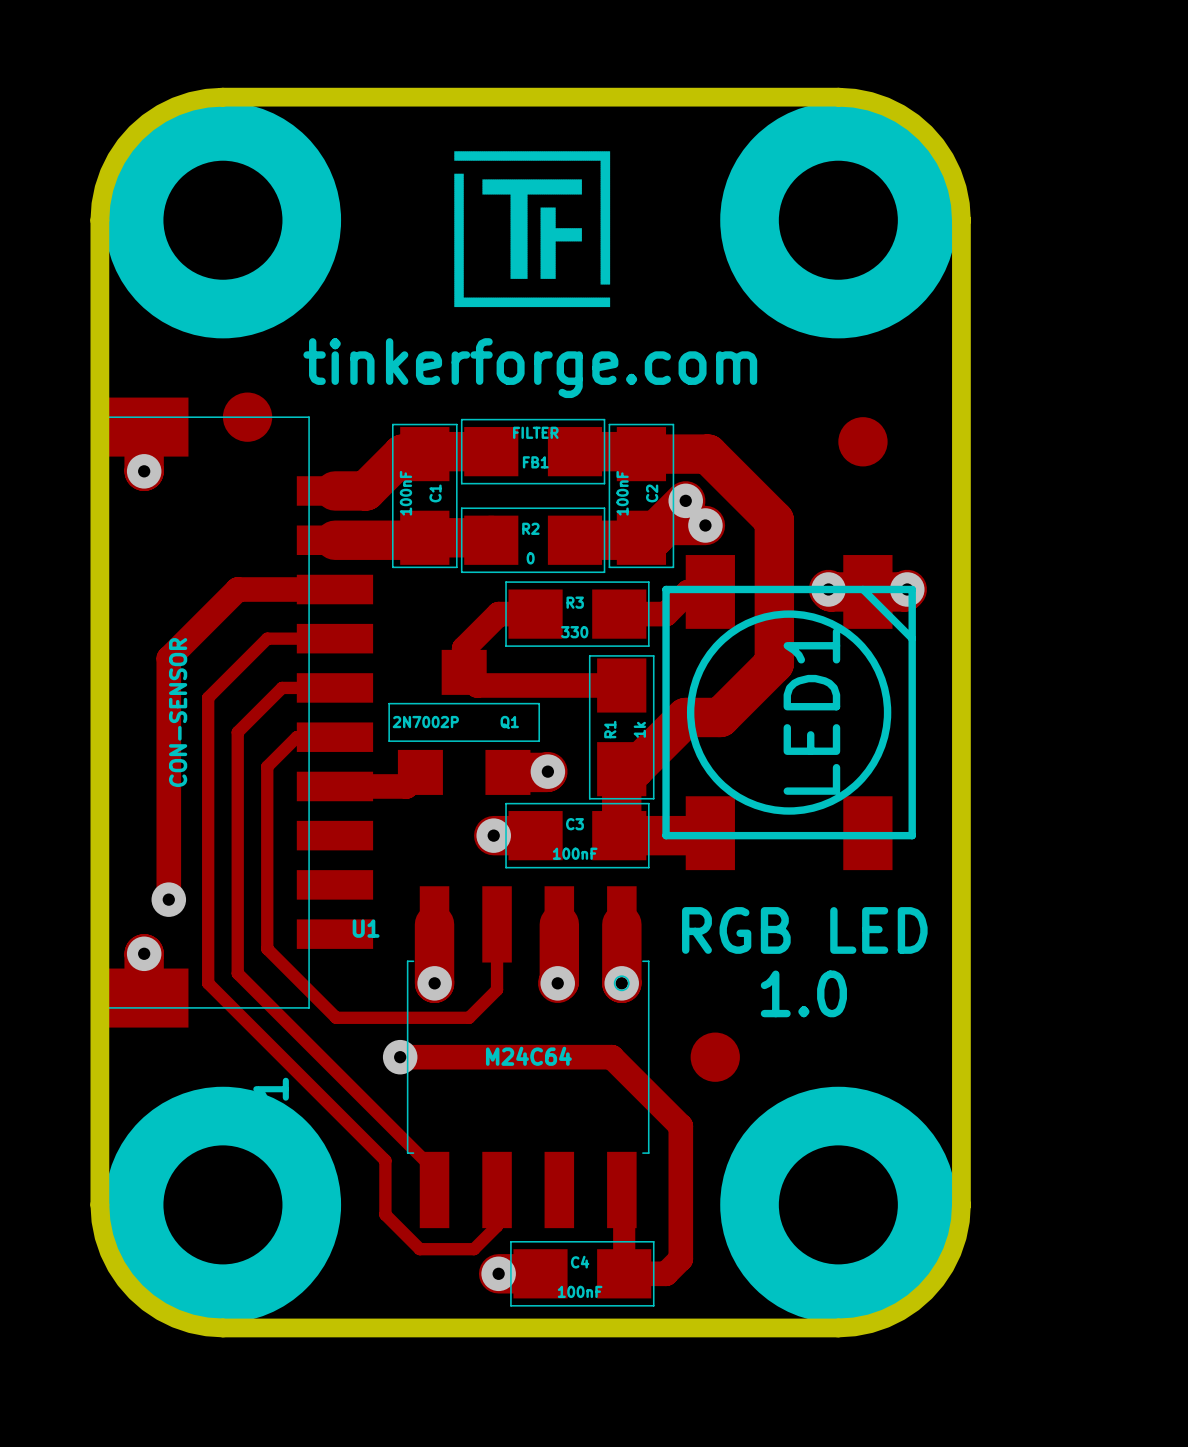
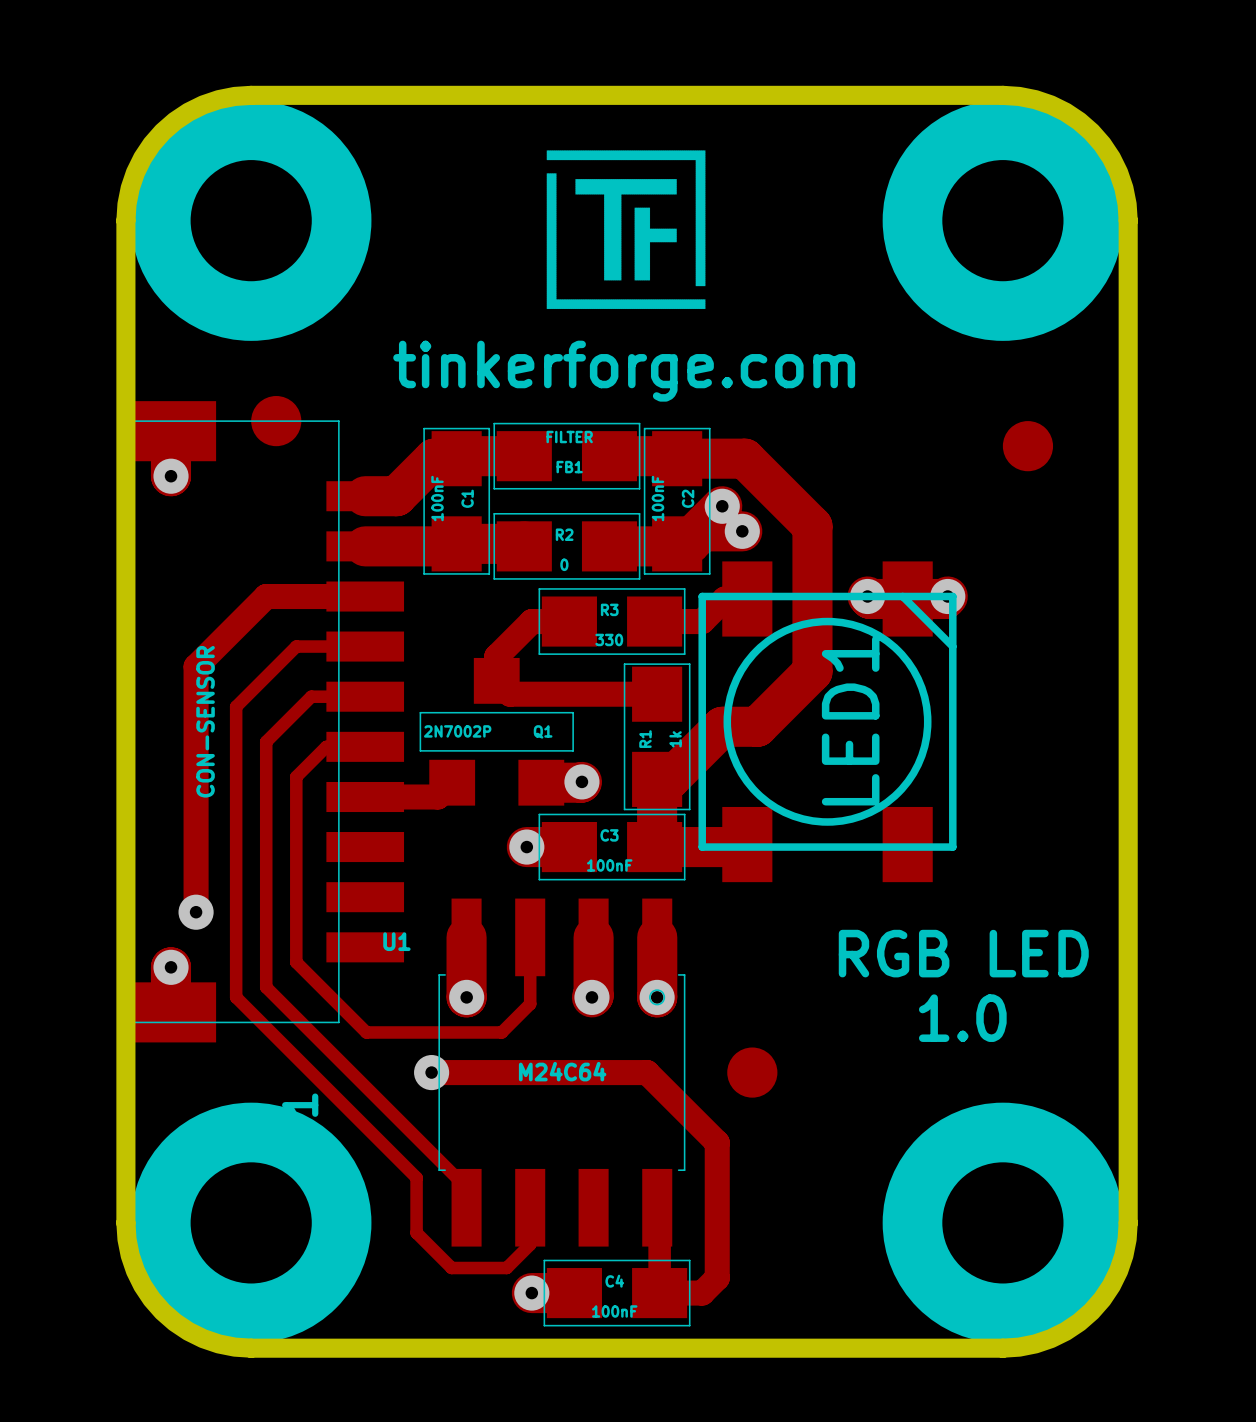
board edge: (838, 97) (854, 98) (885, 106) (913, 122) (925, 133) (944, 158) (952, 173) (960, 204) (961, 220) (960, 1220) (957, 1236) (944, 1266) (925, 1291) (899, 1311) (885, 1318) (854, 1326) (838, 1327) -> (877, 95) (1019, 96) (1050, 104) (1065, 112) (1091, 132) (1111, 157) (1123, 188) (1128, 220) (1128, 1222) (1123, 1255) (1111, 1285) (1091, 1311) (1065, 1331) (1050, 1338) (1019, 1347) (1002, 1348) (877, 1348)
part position: (838, 220) -> (1002, 220)
drawing position: (532, 229) -> (626, 229)
text position: tinkerforge.com (530, 368) -> tinkerforge.com (624, 371)
part position: (862, 441) -> (1027, 446)
text position: RGB LED (804, 930) -> RGB LED (963, 953)
text position: 1.0 (803, 993) -> 1.0 (962, 1018)
part position: (838, 1204) -> (1002, 1222)

